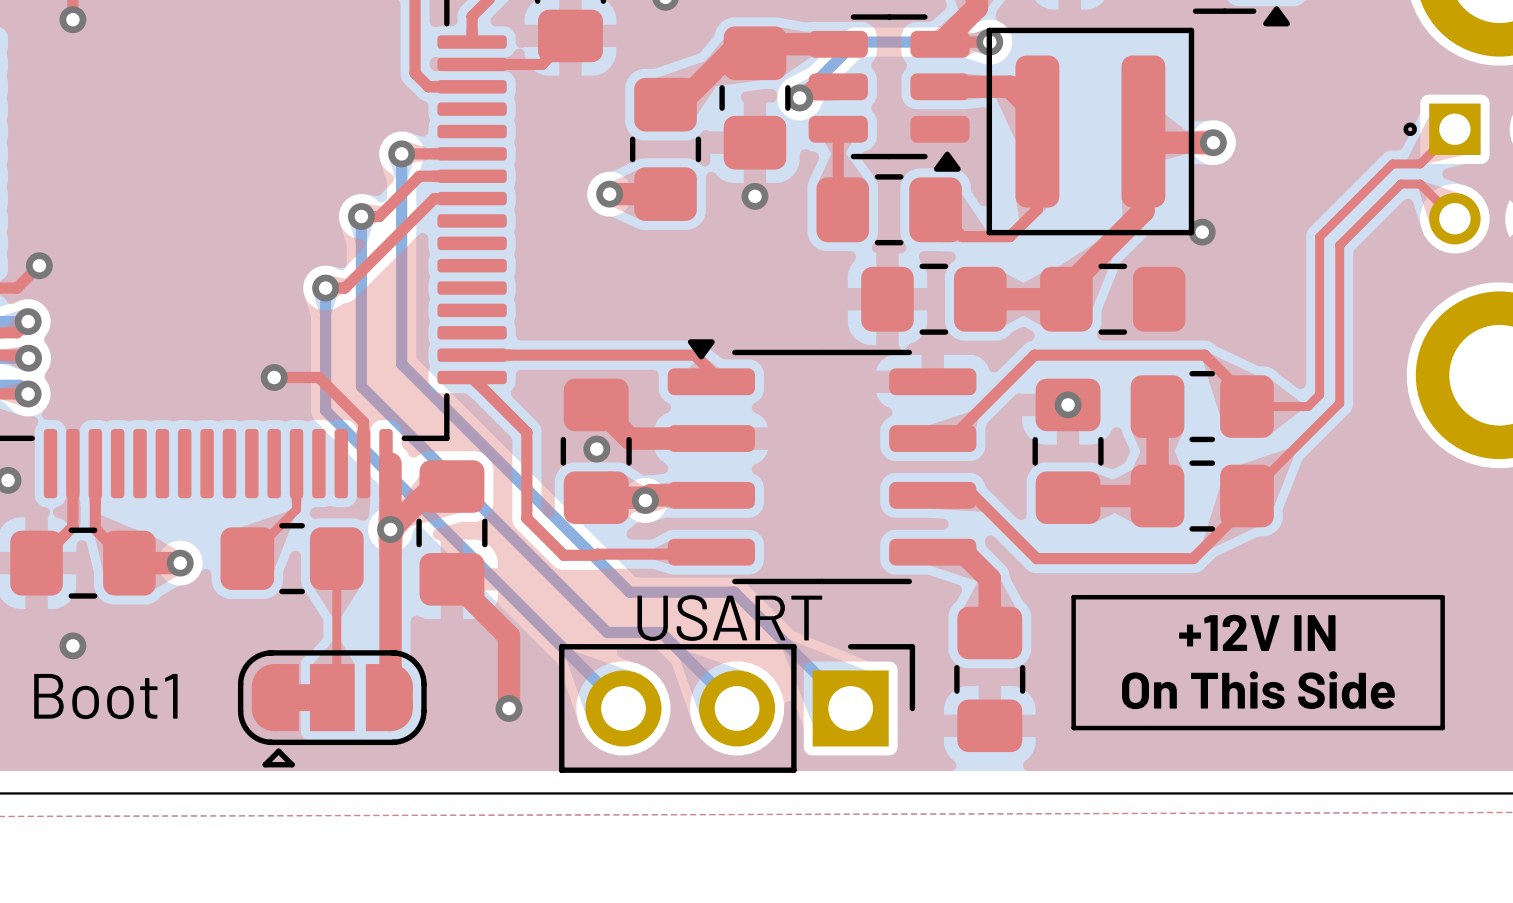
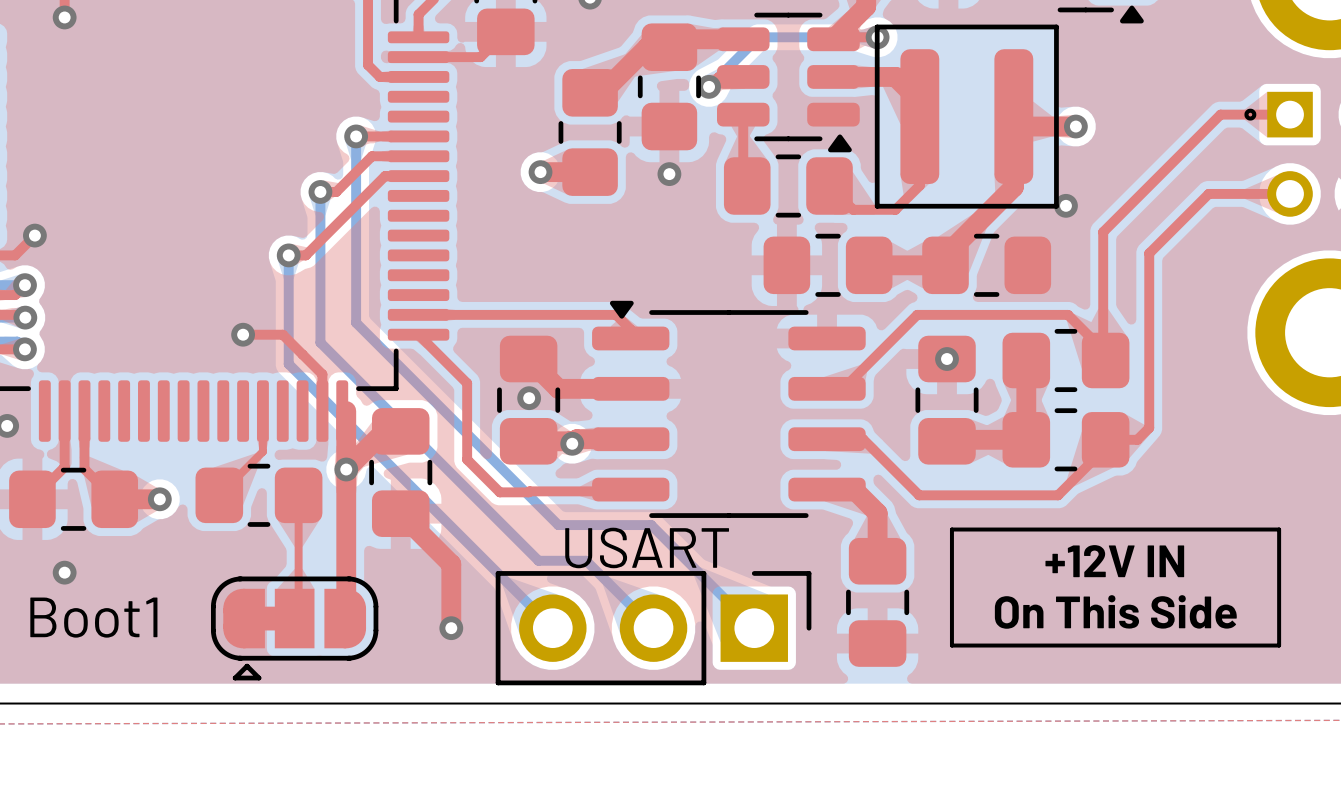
top track: (1454, 129) (1420, 163) (1392, 163) (1319, 236) (1319, 394) (1307, 406) (1246, 406) -> (1290, 114) (1220, 114) (1103, 232) (1103, 358)
top track: (1454, 218) (1420, 184) (1400, 184) (1339, 245) (1339, 403) (1246, 496) -> (1290, 193) (1208, 193) (1149, 253) (1149, 427) (1137, 439) (1105, 439)

